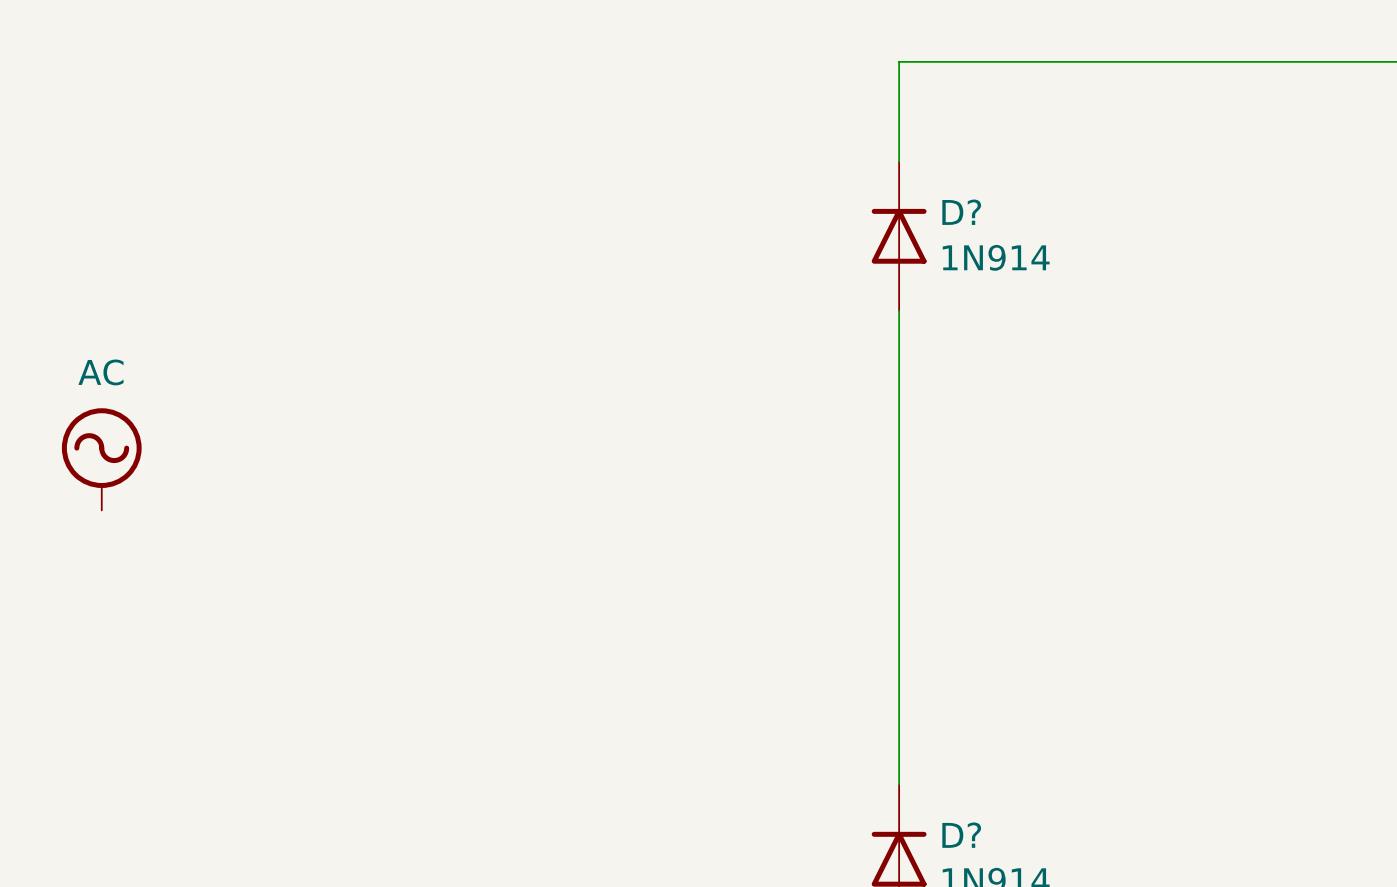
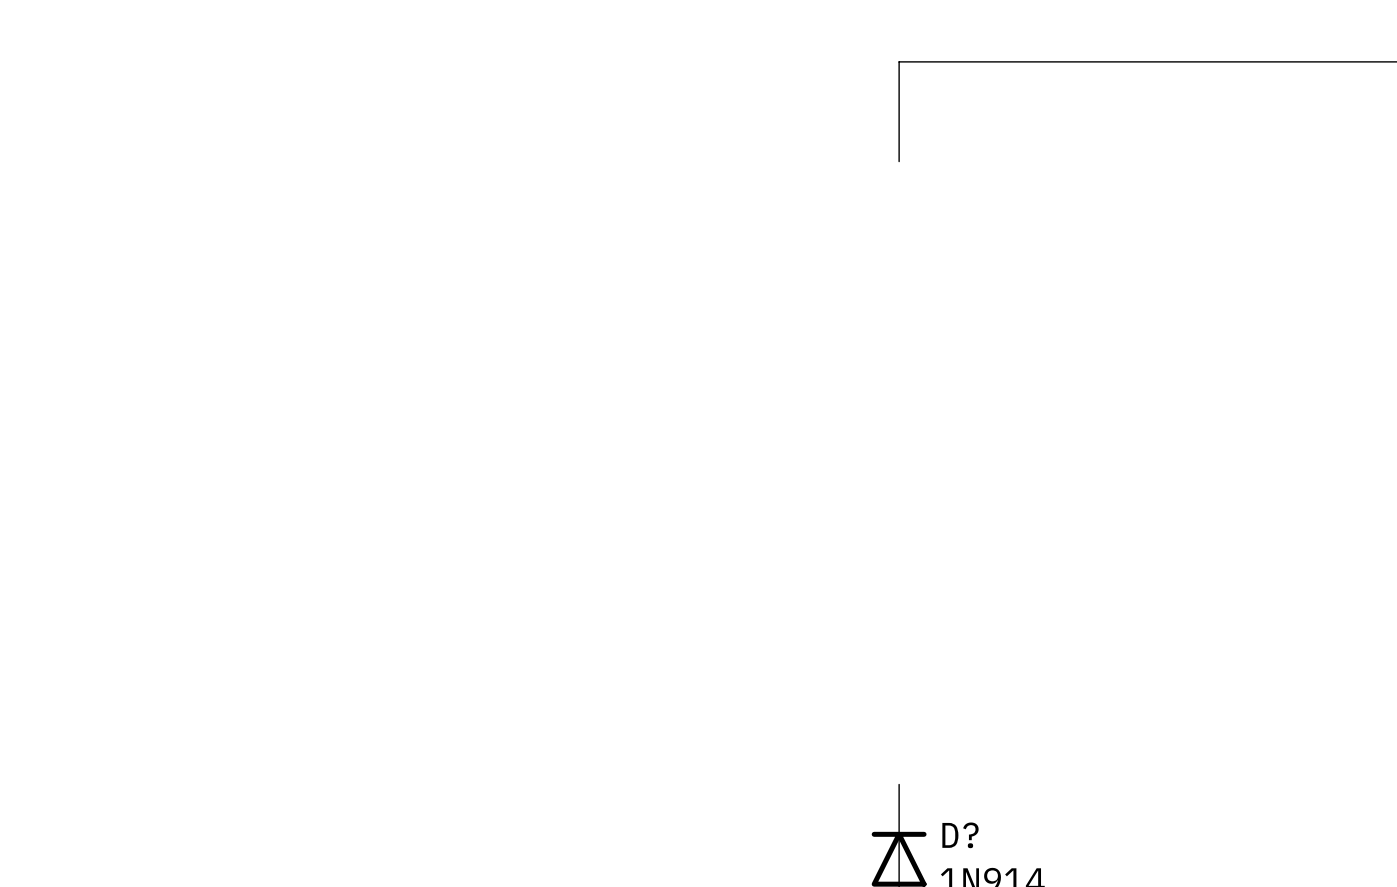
D?: 1N914 (899, 236) -> none
wire: (899, 311) (899, 784) -> none
power symbol: AC (101, 459) -> none

